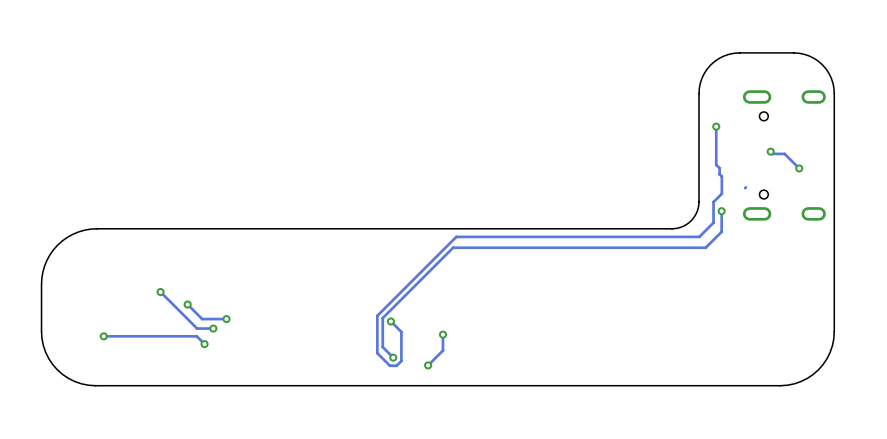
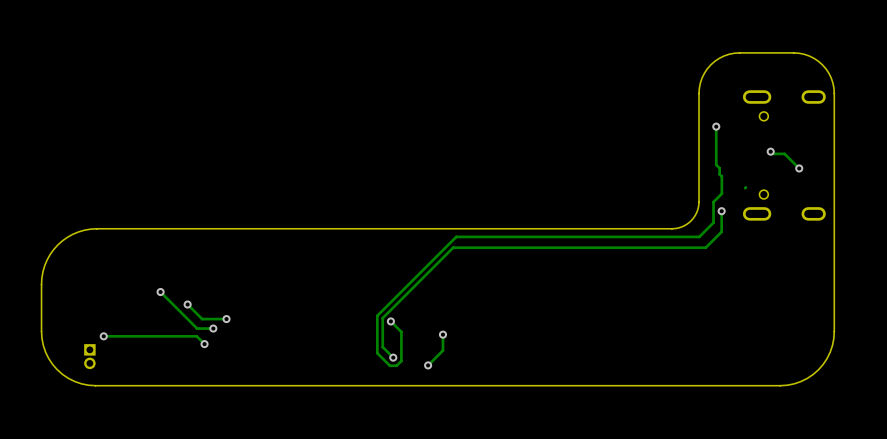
part: none -> (89, 356)

